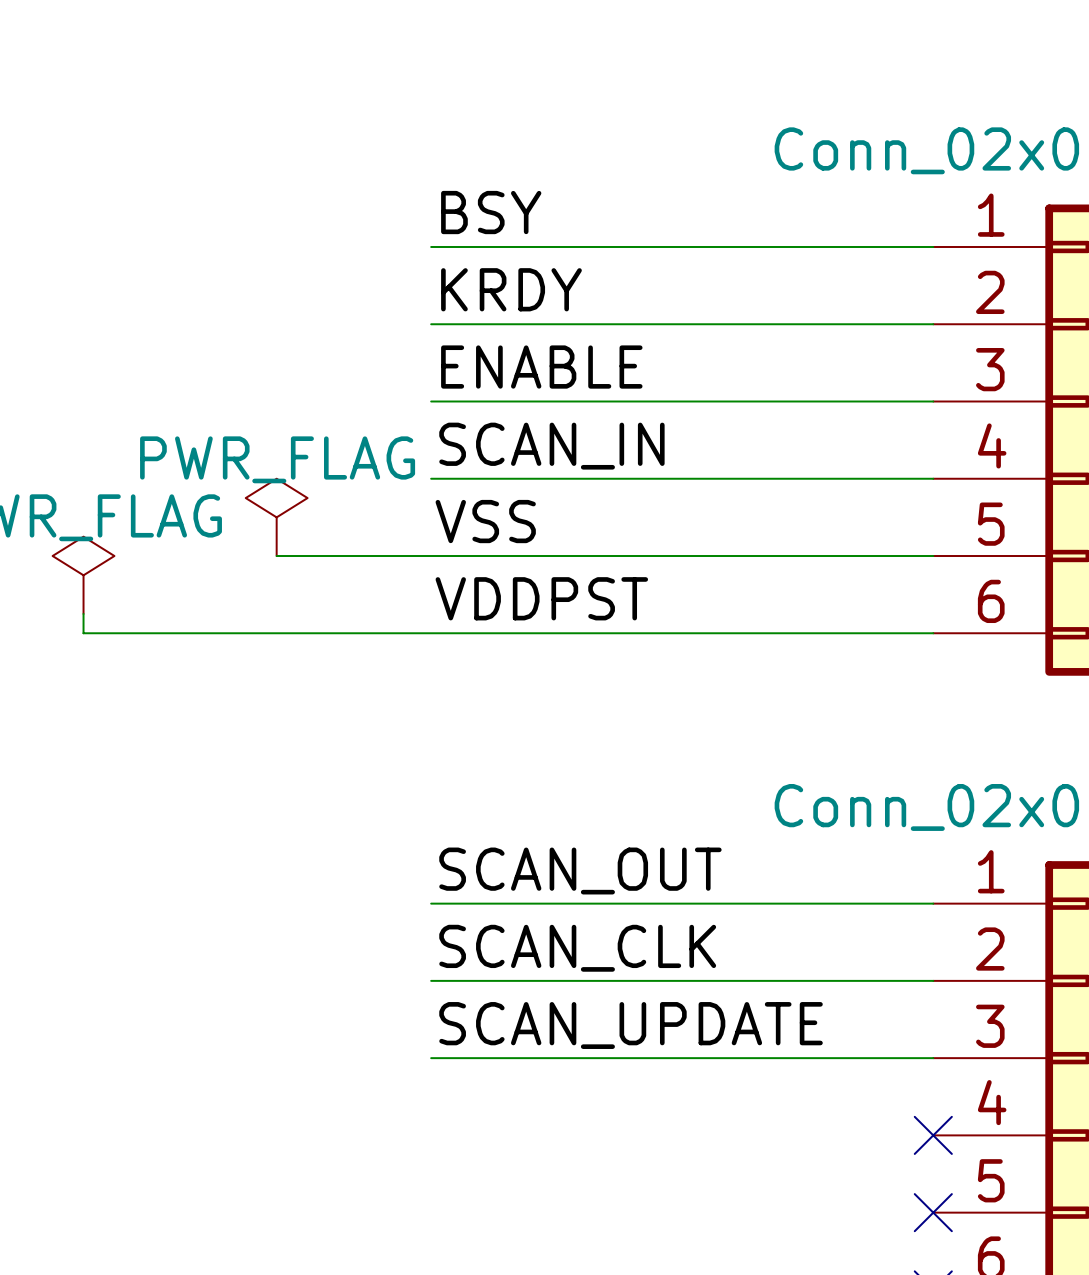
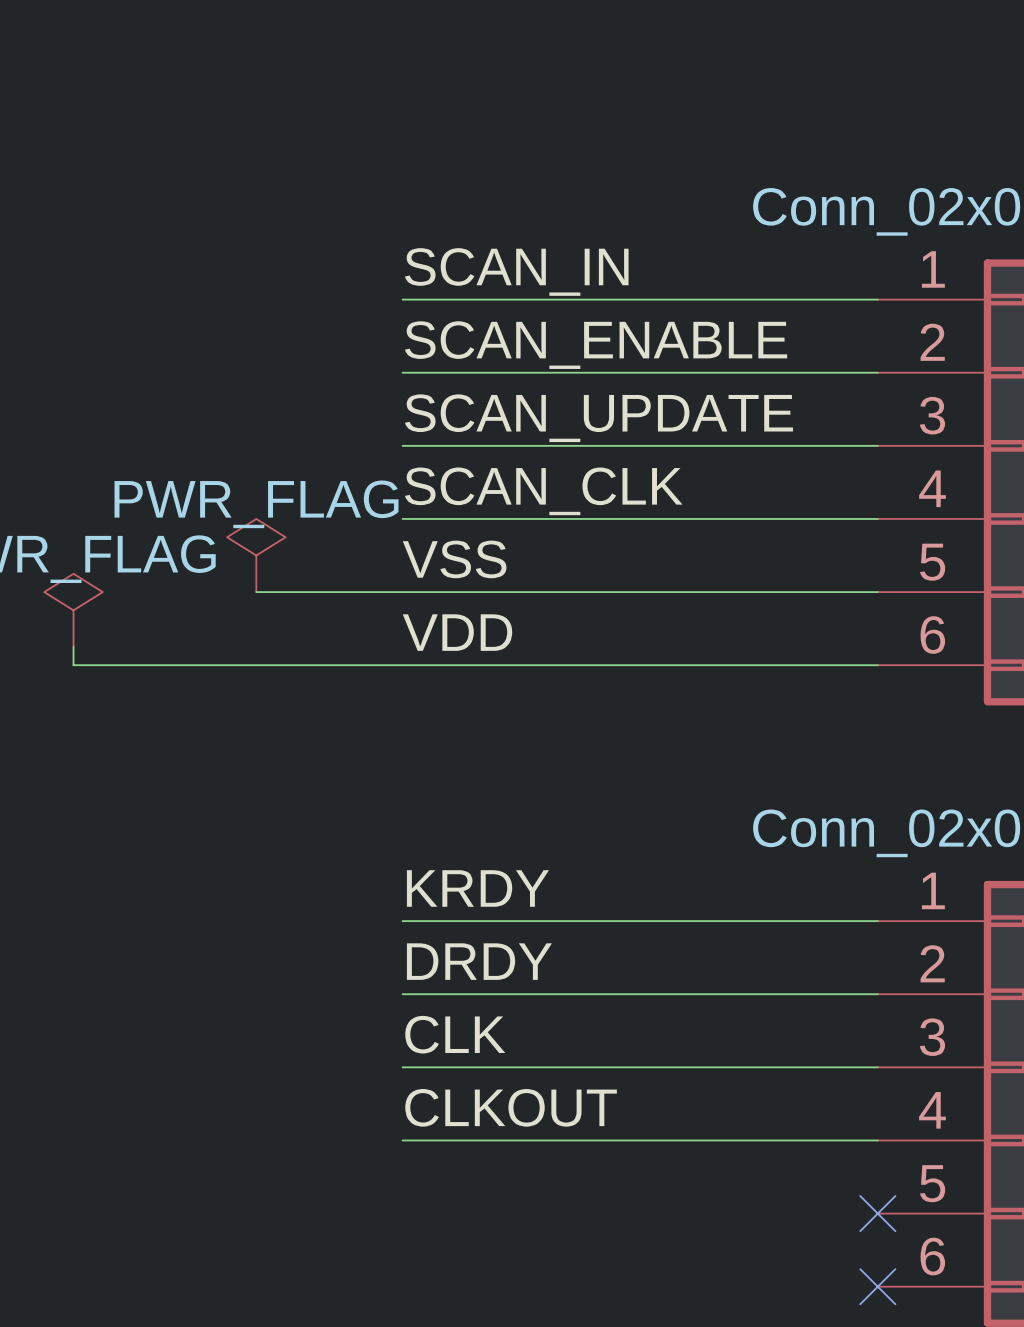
label: BSY (491, 212) -> SCAN_IN (516, 271)
label: KRDY (511, 289) -> SCAN_ENABLE (596, 345)
label: ENABLE (541, 367) -> SCAN_UPDATE (598, 418)
label: SCAN_IN (551, 446) -> SCAN_CLK (543, 491)
label: VDDPST (541, 598) -> VDD (457, 632)
label: SCAN_OUT (580, 871) -> KRDY (477, 888)
label: SCAN_CLK (577, 948) -> DRDY (479, 961)
label: SCAN_UPDATE (631, 1025) -> CLK (455, 1034)
label: none -> CLKOUT (511, 1107)
wire: none -> (402, 1140) (877, 1140)
no-connect mark: (933, 1135) -> none

